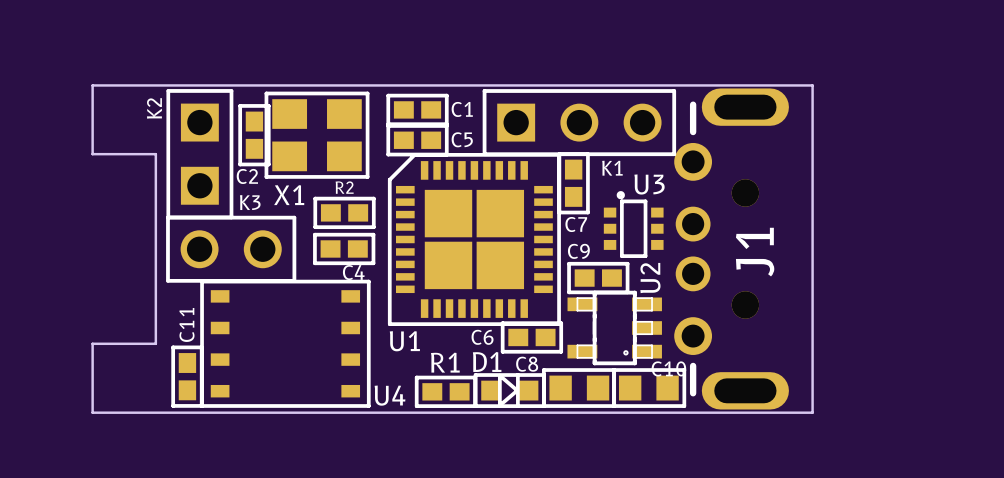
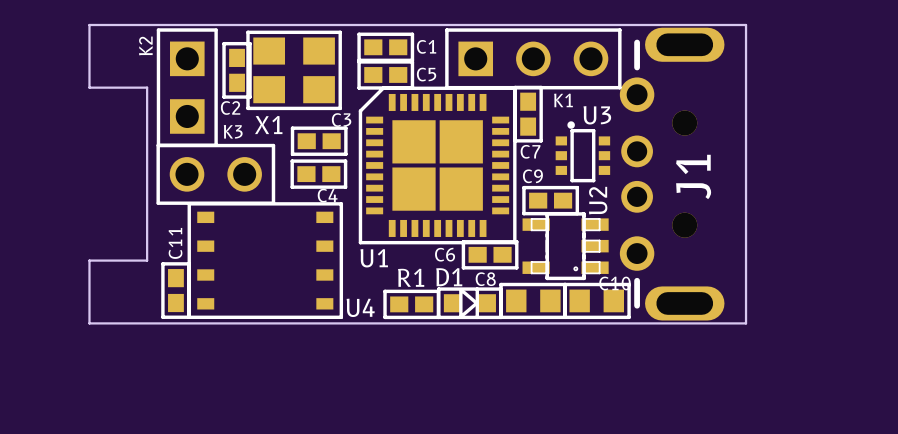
R2 name: R2 (344, 187) -> C3 (341, 120)

